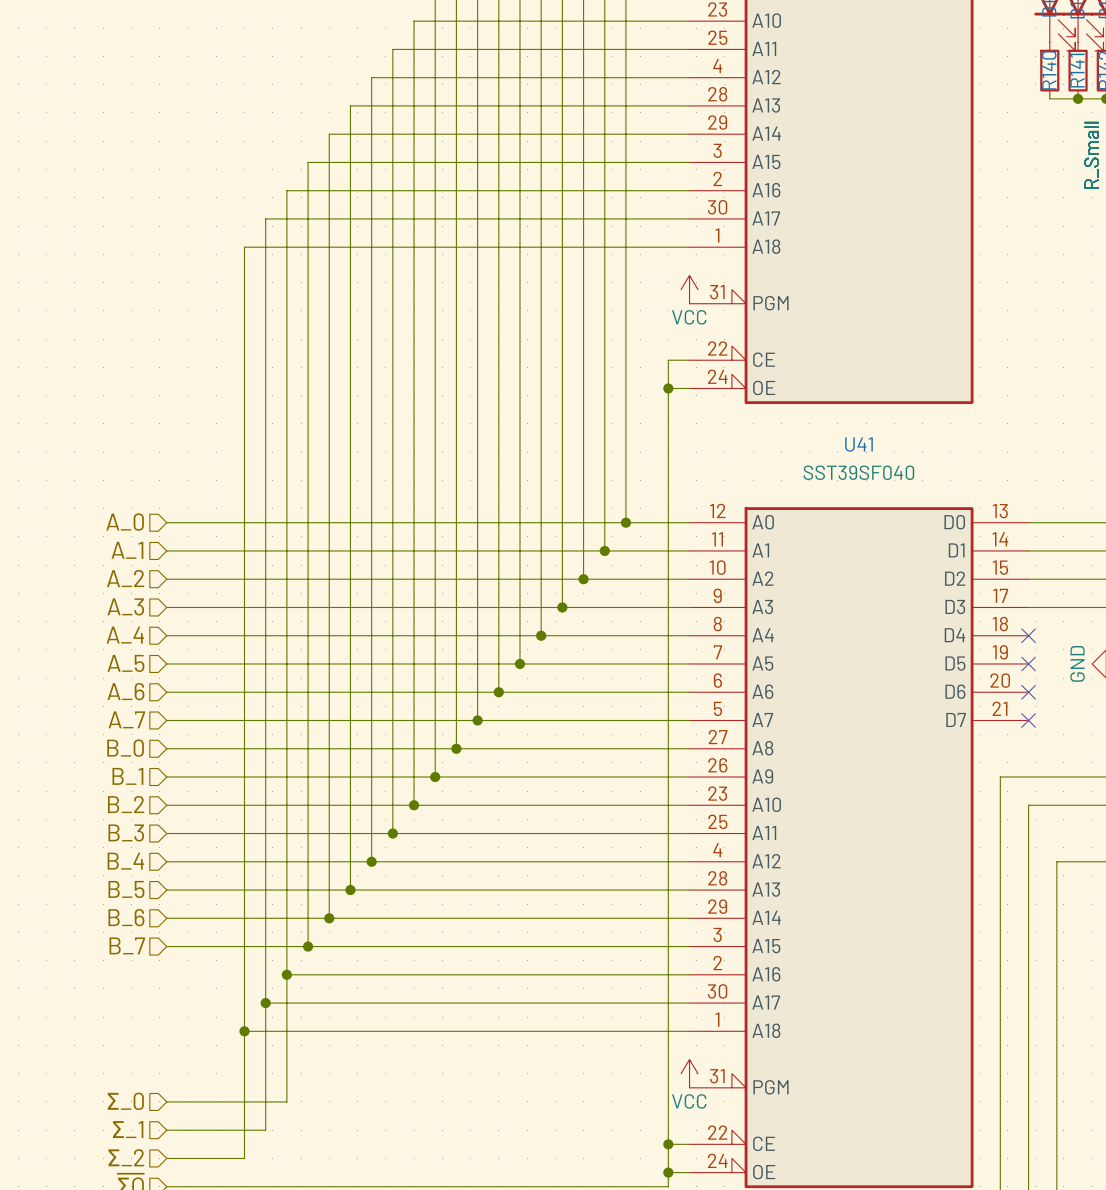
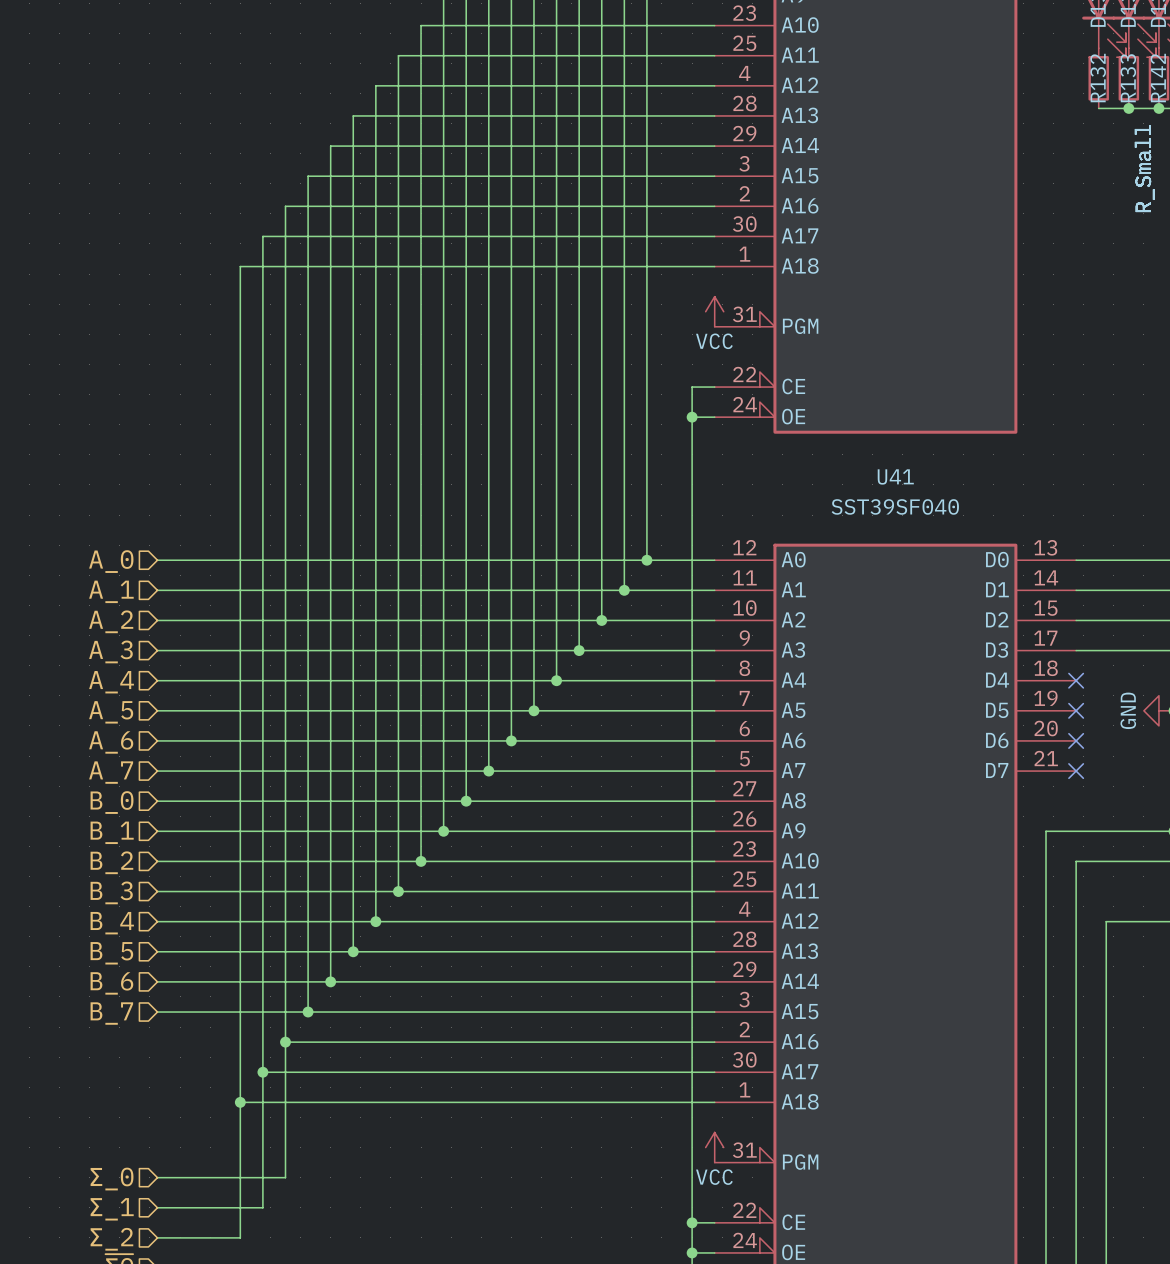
R140 name: R140 (1049, 70) -> R132 (1098, 78)
R141 name: R141 (1077, 70) -> R133 (1128, 78)

